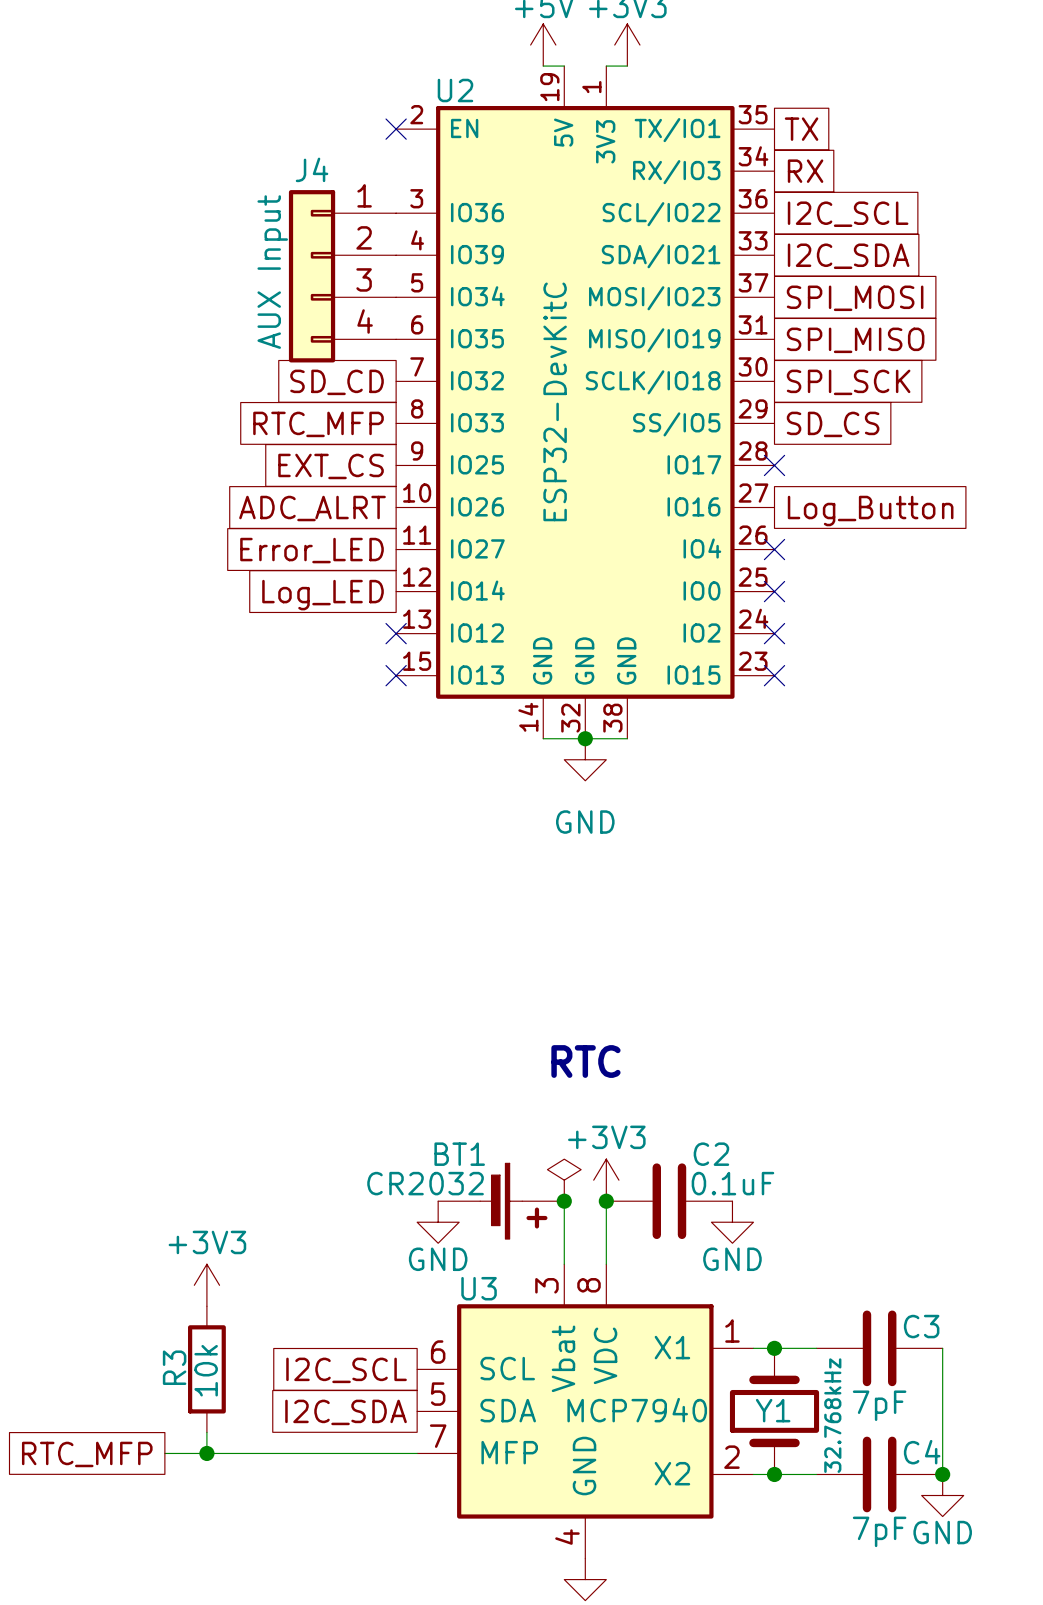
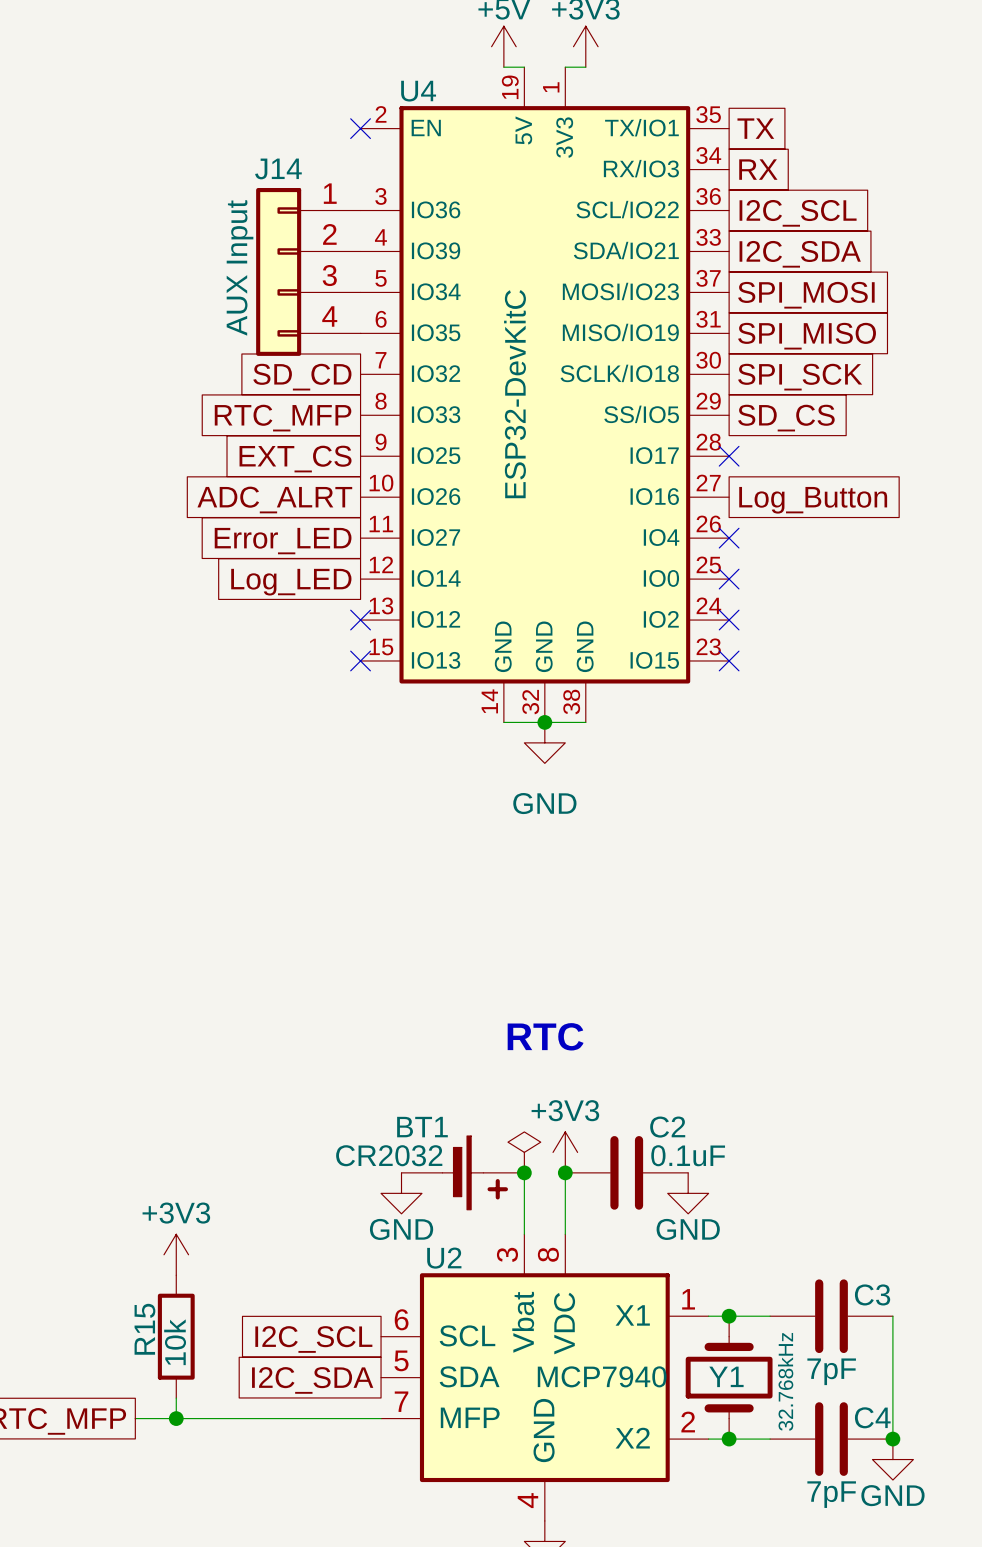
U2 name: U2 (455, 90) -> U4 (418, 91)
J4 name: J4 (312, 169) -> J14 (278, 168)
U3 name: U3 (479, 1288) -> U2 (444, 1258)
R3 name: R3 (174, 1367) -> R15 (144, 1329)

